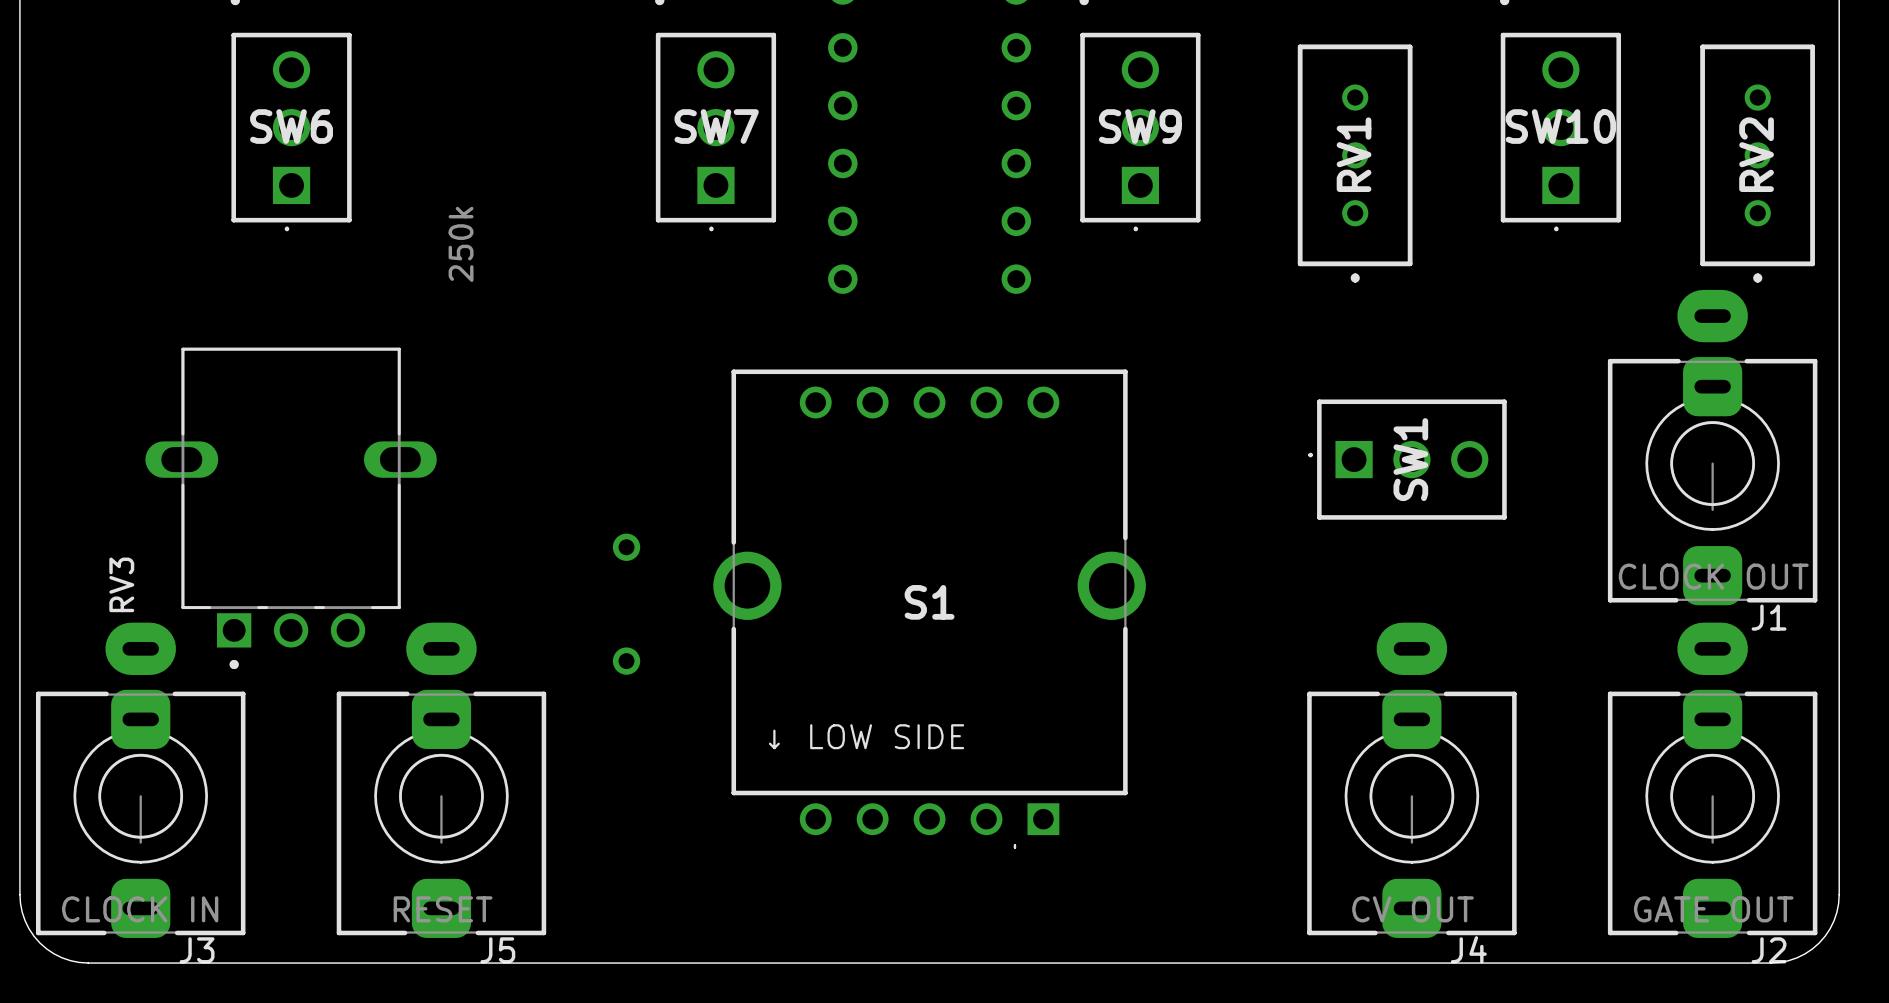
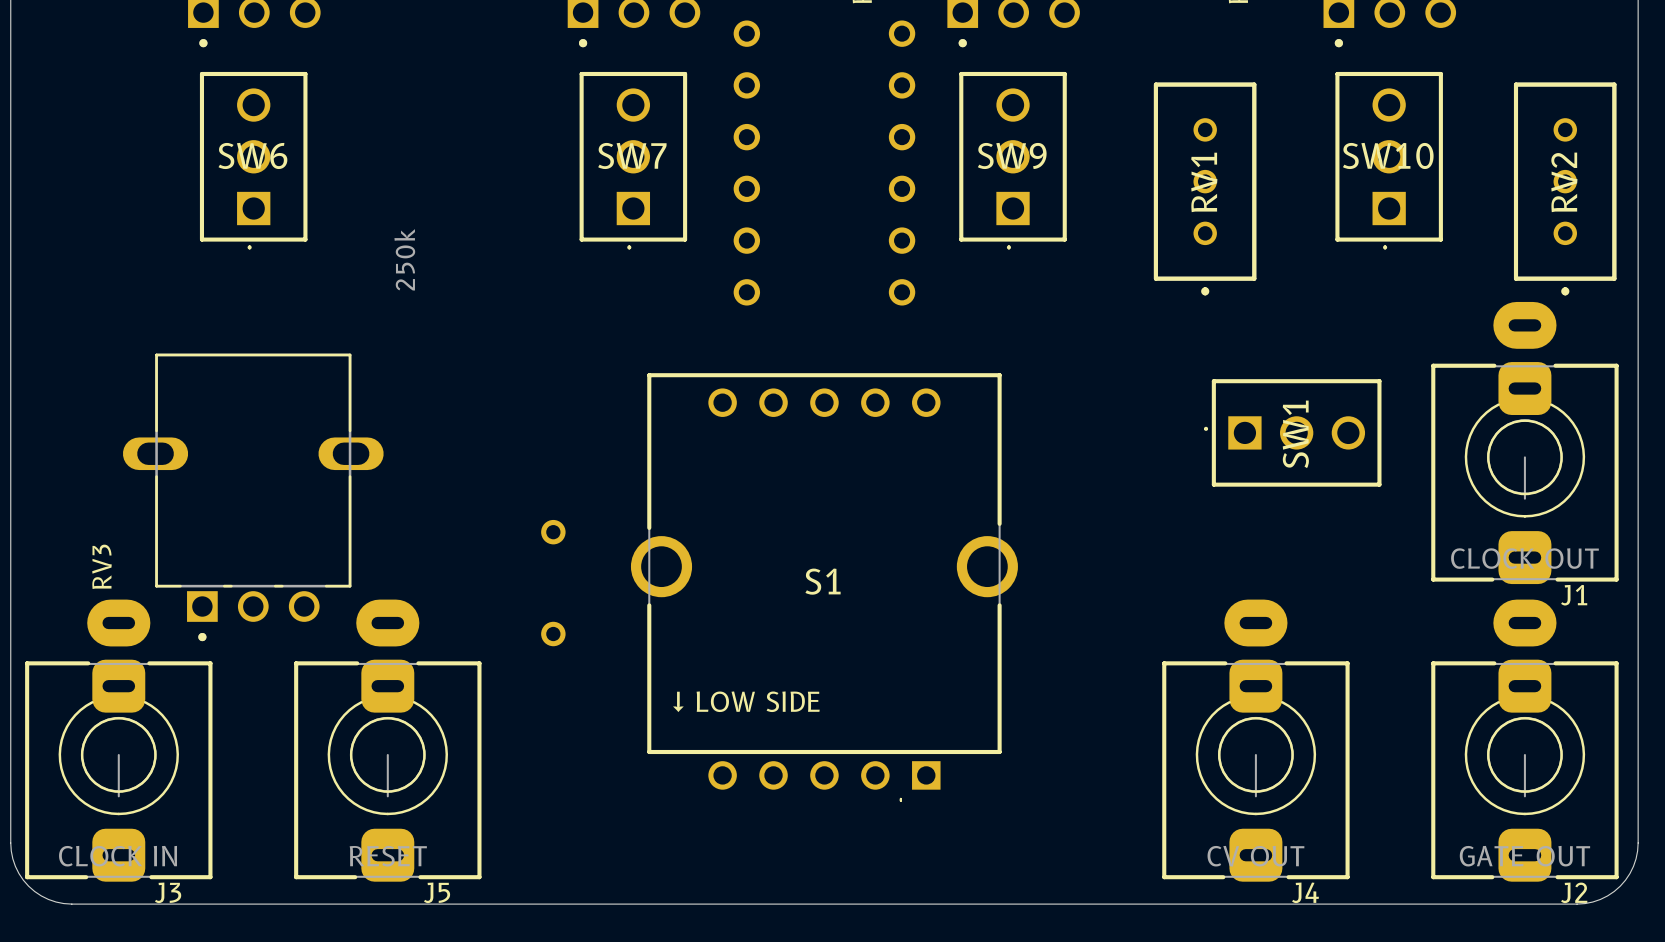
SW1 position: (1407, 459) -> (1292, 432)

